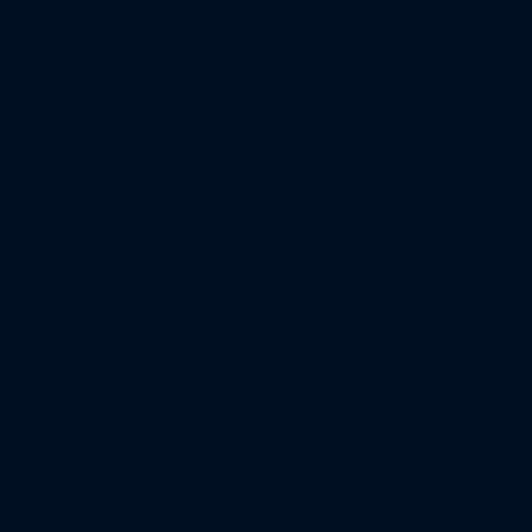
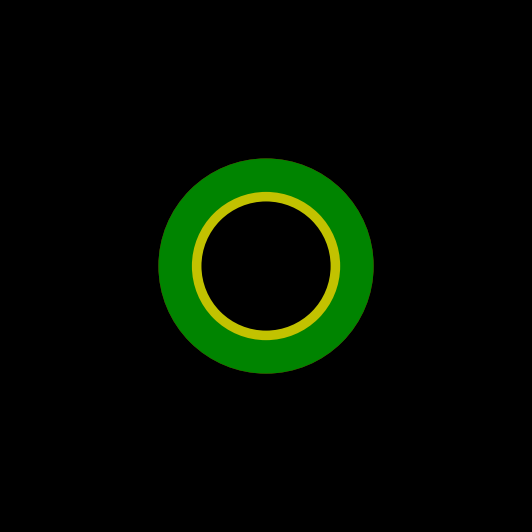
part: none -> (266, 266)

